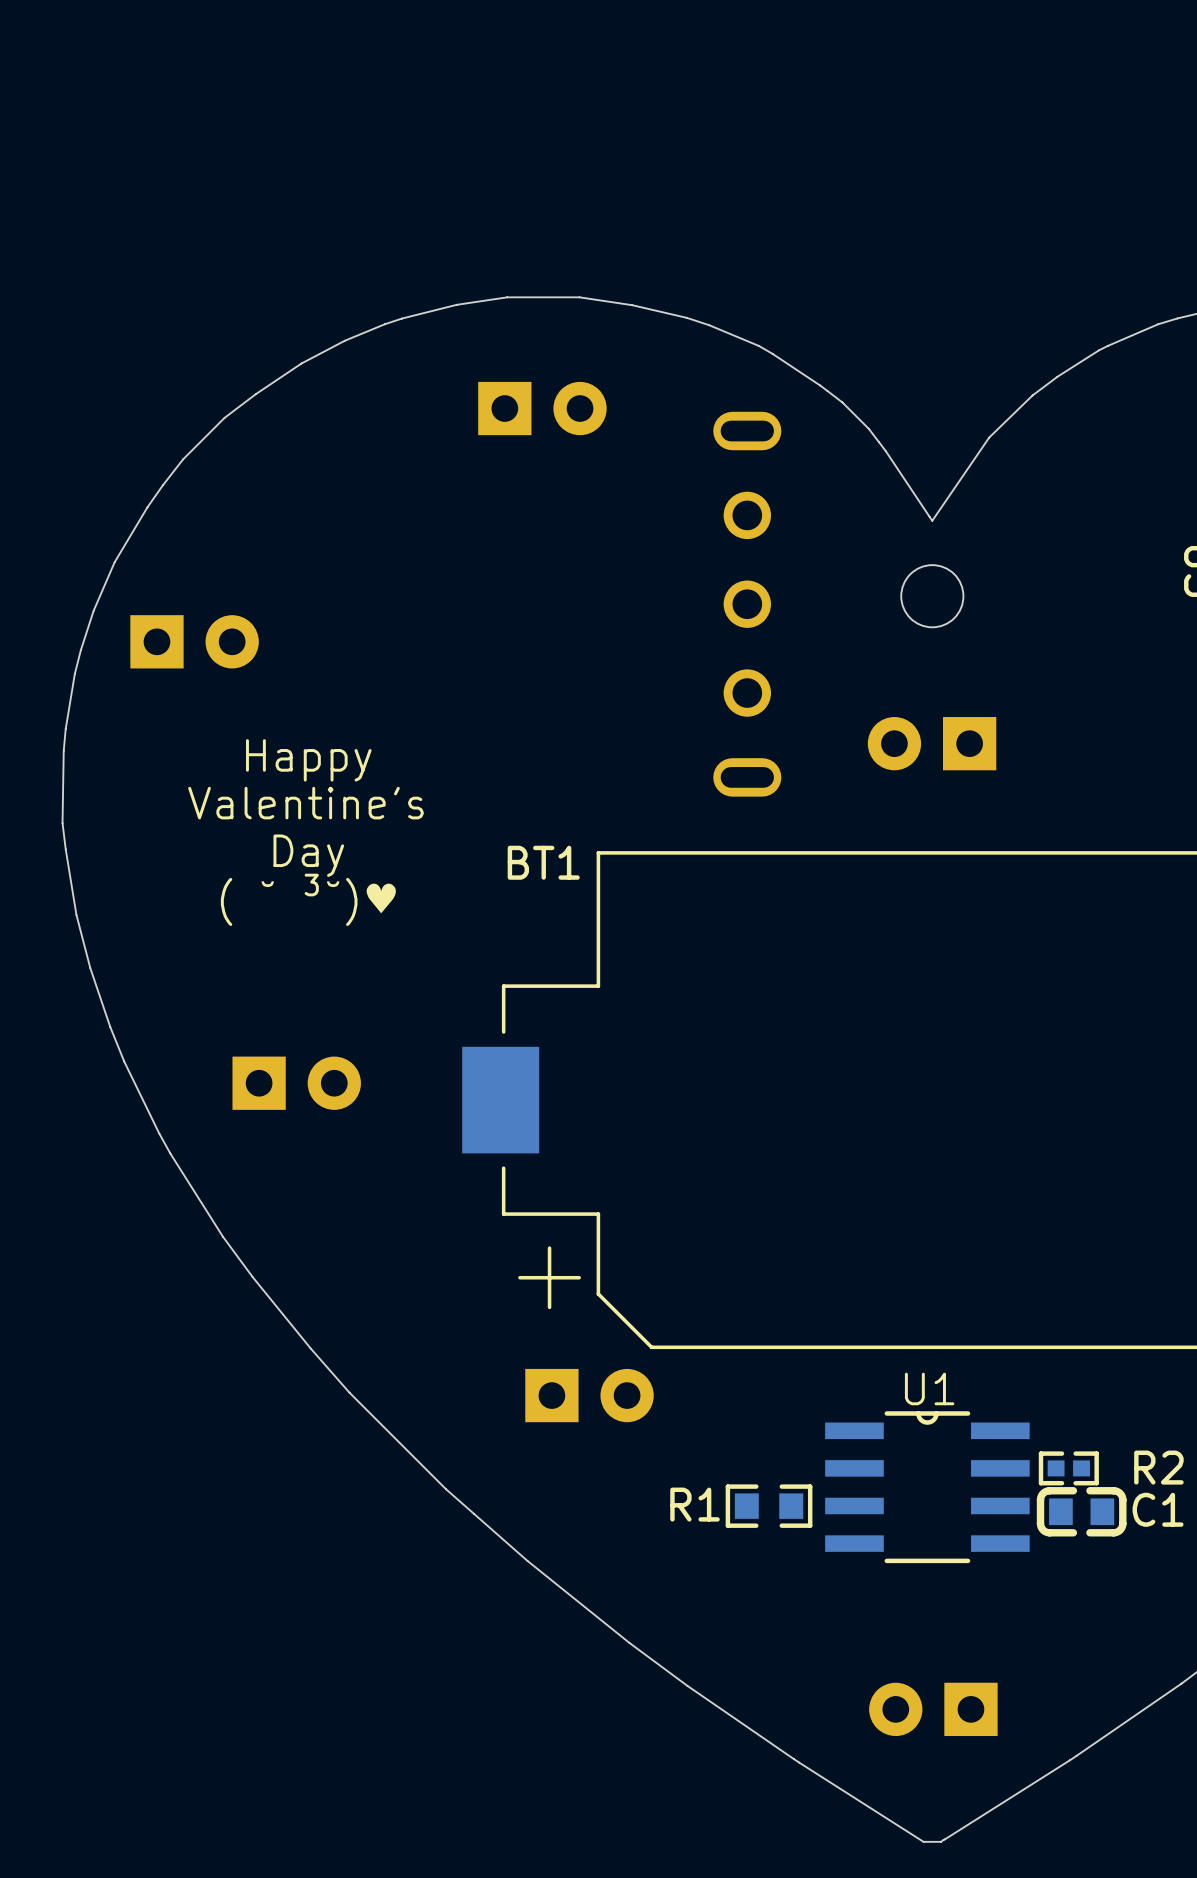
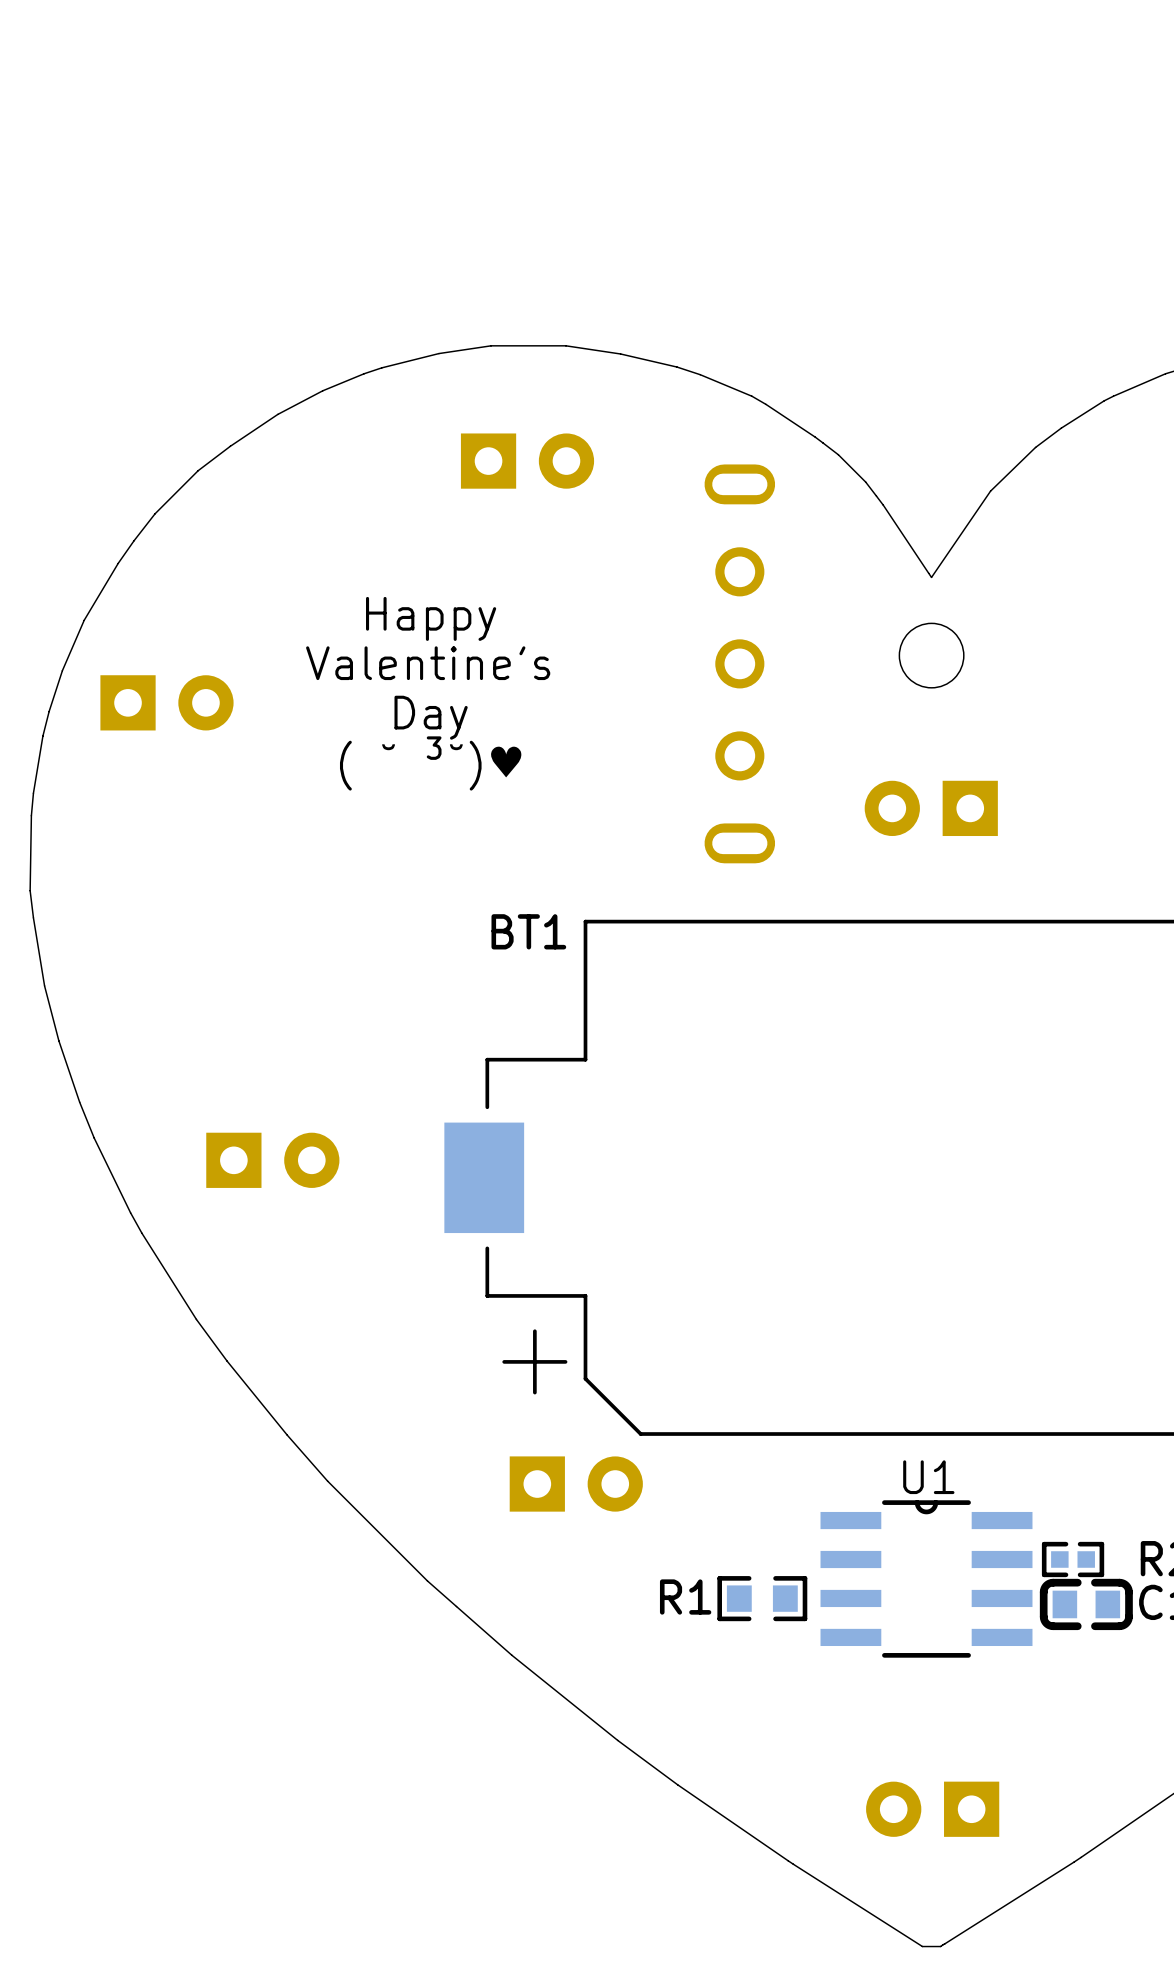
text position: Happy (308, 760) -> Happy (431, 618)
text position: Valentine's (305, 803) -> Valentine's (428, 663)
text position: Day (308, 855) -> Day (431, 717)
text position: ( ˘ ³˘)♥ (309, 899) -> ( ˘ ³˘)♥ (431, 763)

